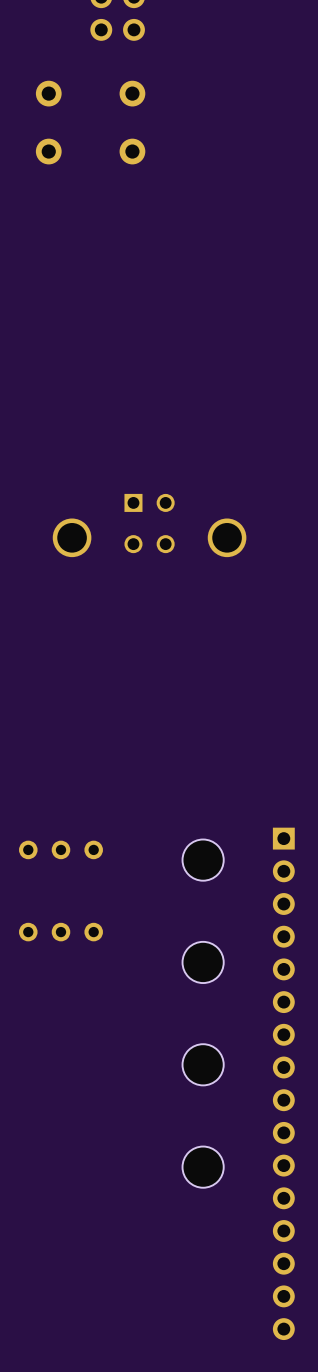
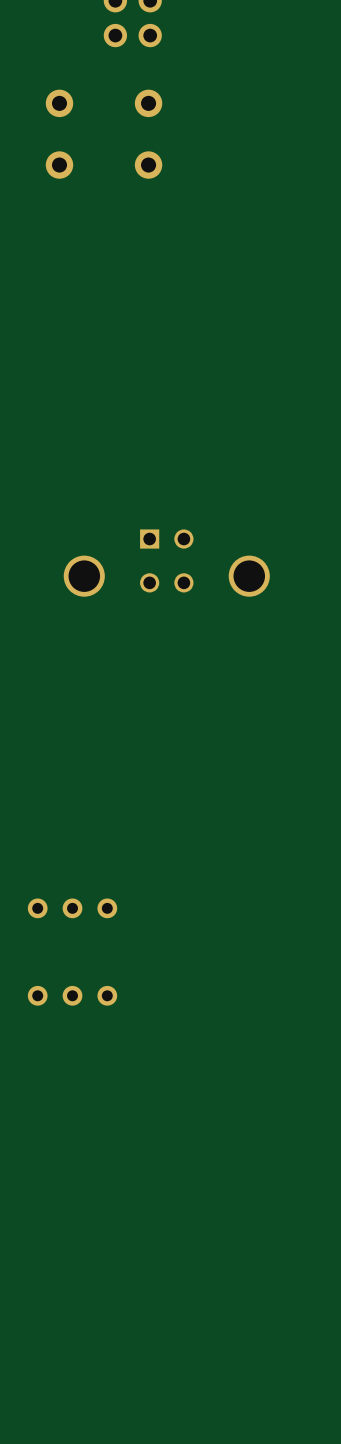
part: (203, 860) -> none
part: (203, 962) -> none
part: (203, 1064) -> none
part: (283, 1083) -> none
part: (203, 1167) -> none

